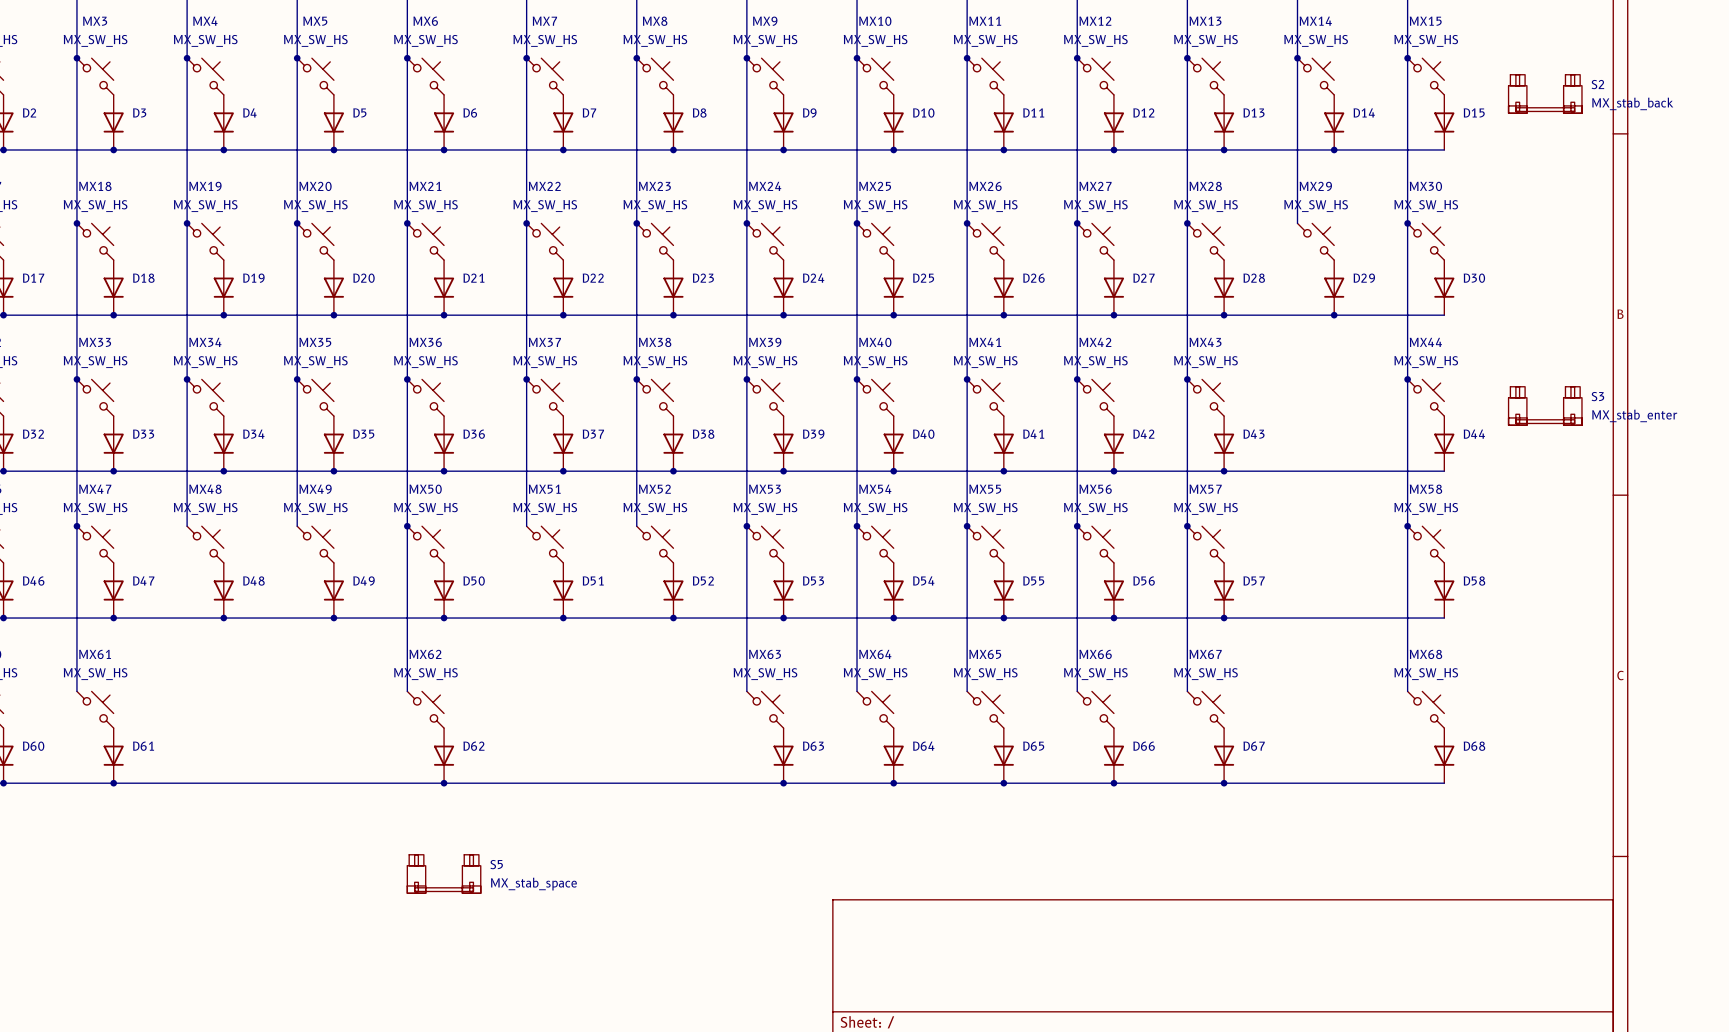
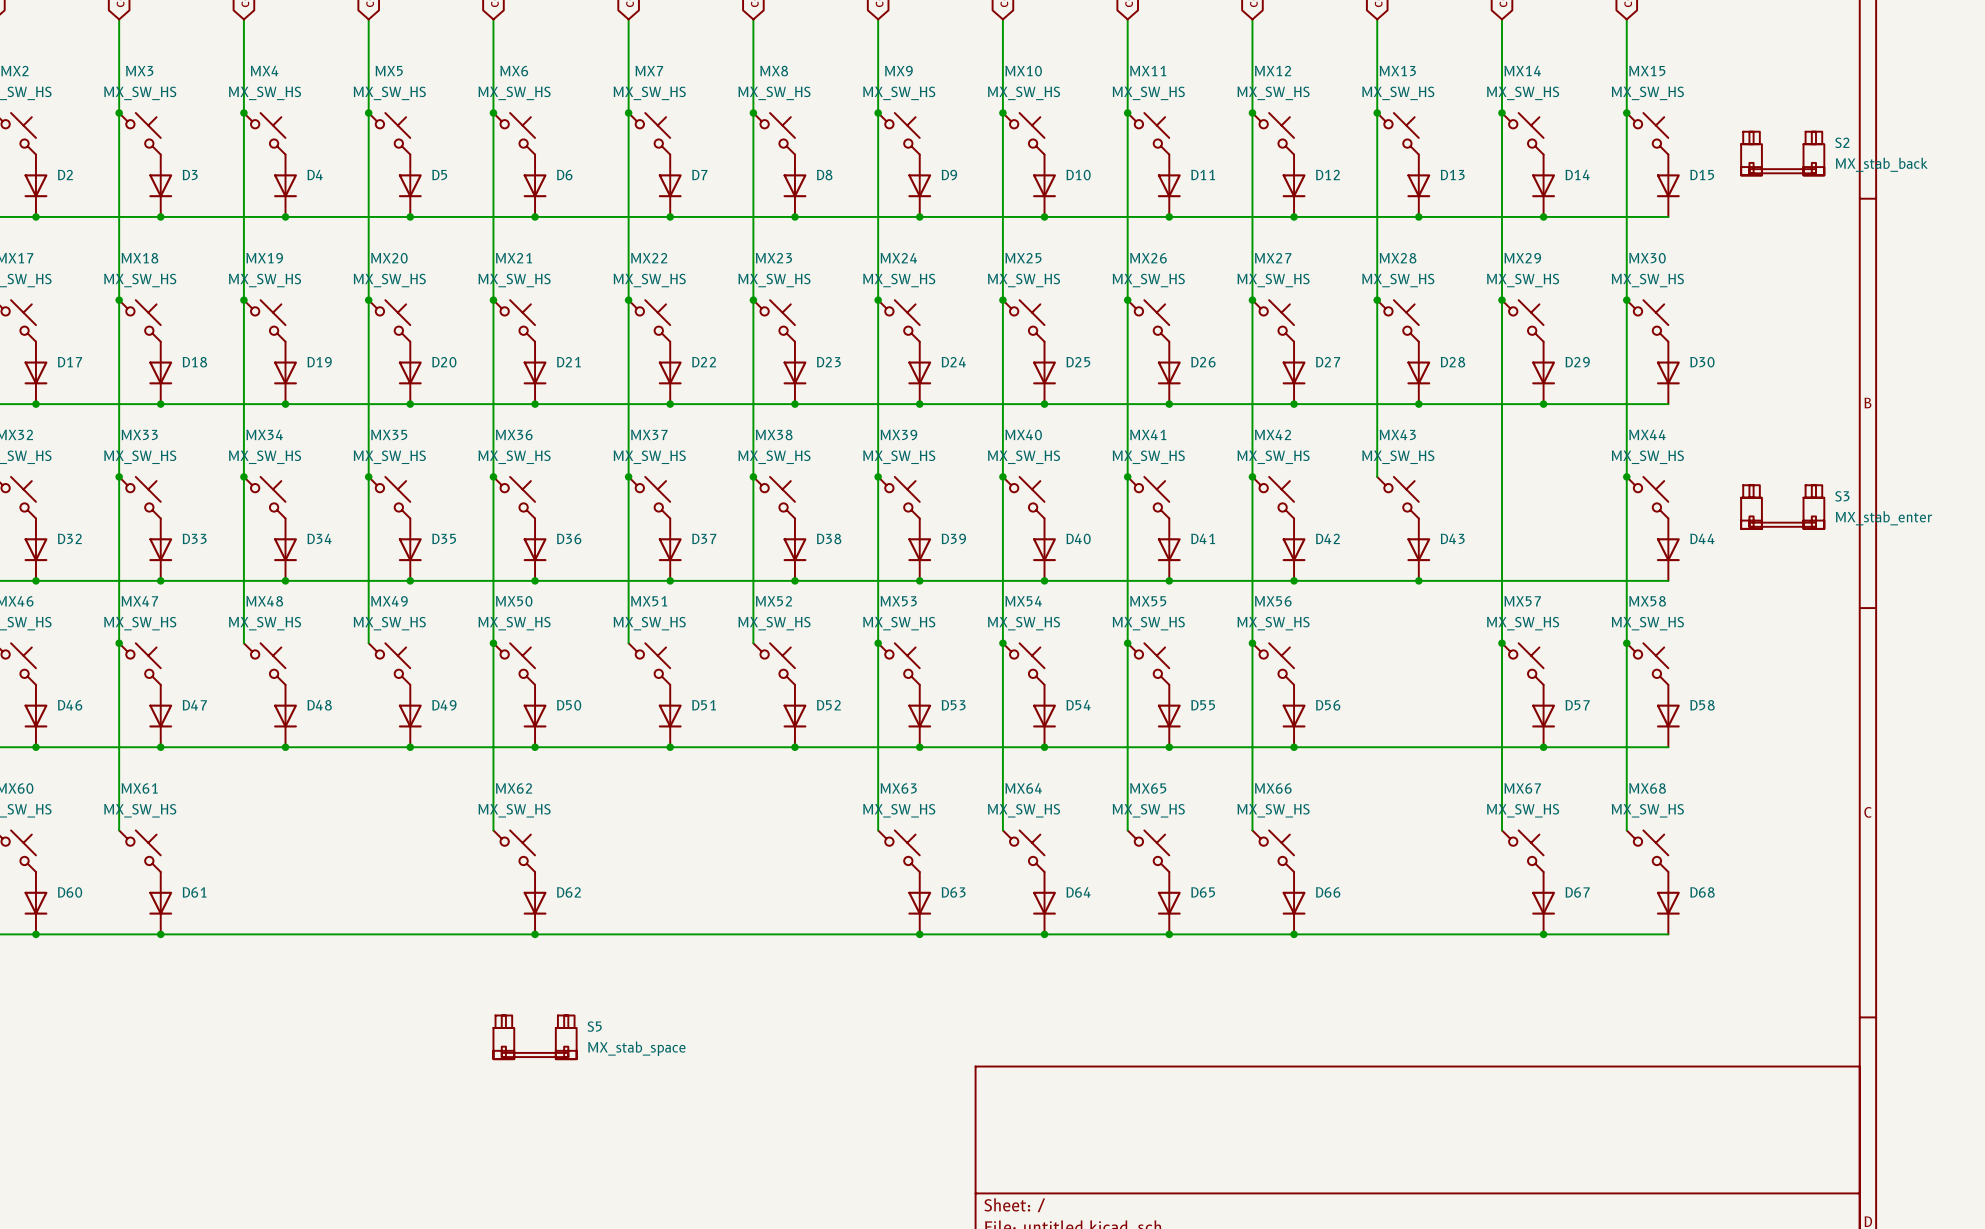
wire: none -> (1501, 300) (1501, 830)
junction: none -> (1501, 300)
wire: (1187, 379) (1187, 691) -> none
junction: (1187, 379) -> none
junction: (1187, 526) -> none
junction: none -> (1501, 643)
MX57 position: (1205, 544) -> (1522, 664)
D57 position: (1224, 590) -> (1543, 716)
junction: (1224, 618) -> none
junction: none -> (1543, 747)
MX67 position: (1205, 709) -> (1522, 851)
D67 position: (1224, 755) -> (1543, 903)
junction: (1224, 783) -> none
junction: none -> (1543, 934)

